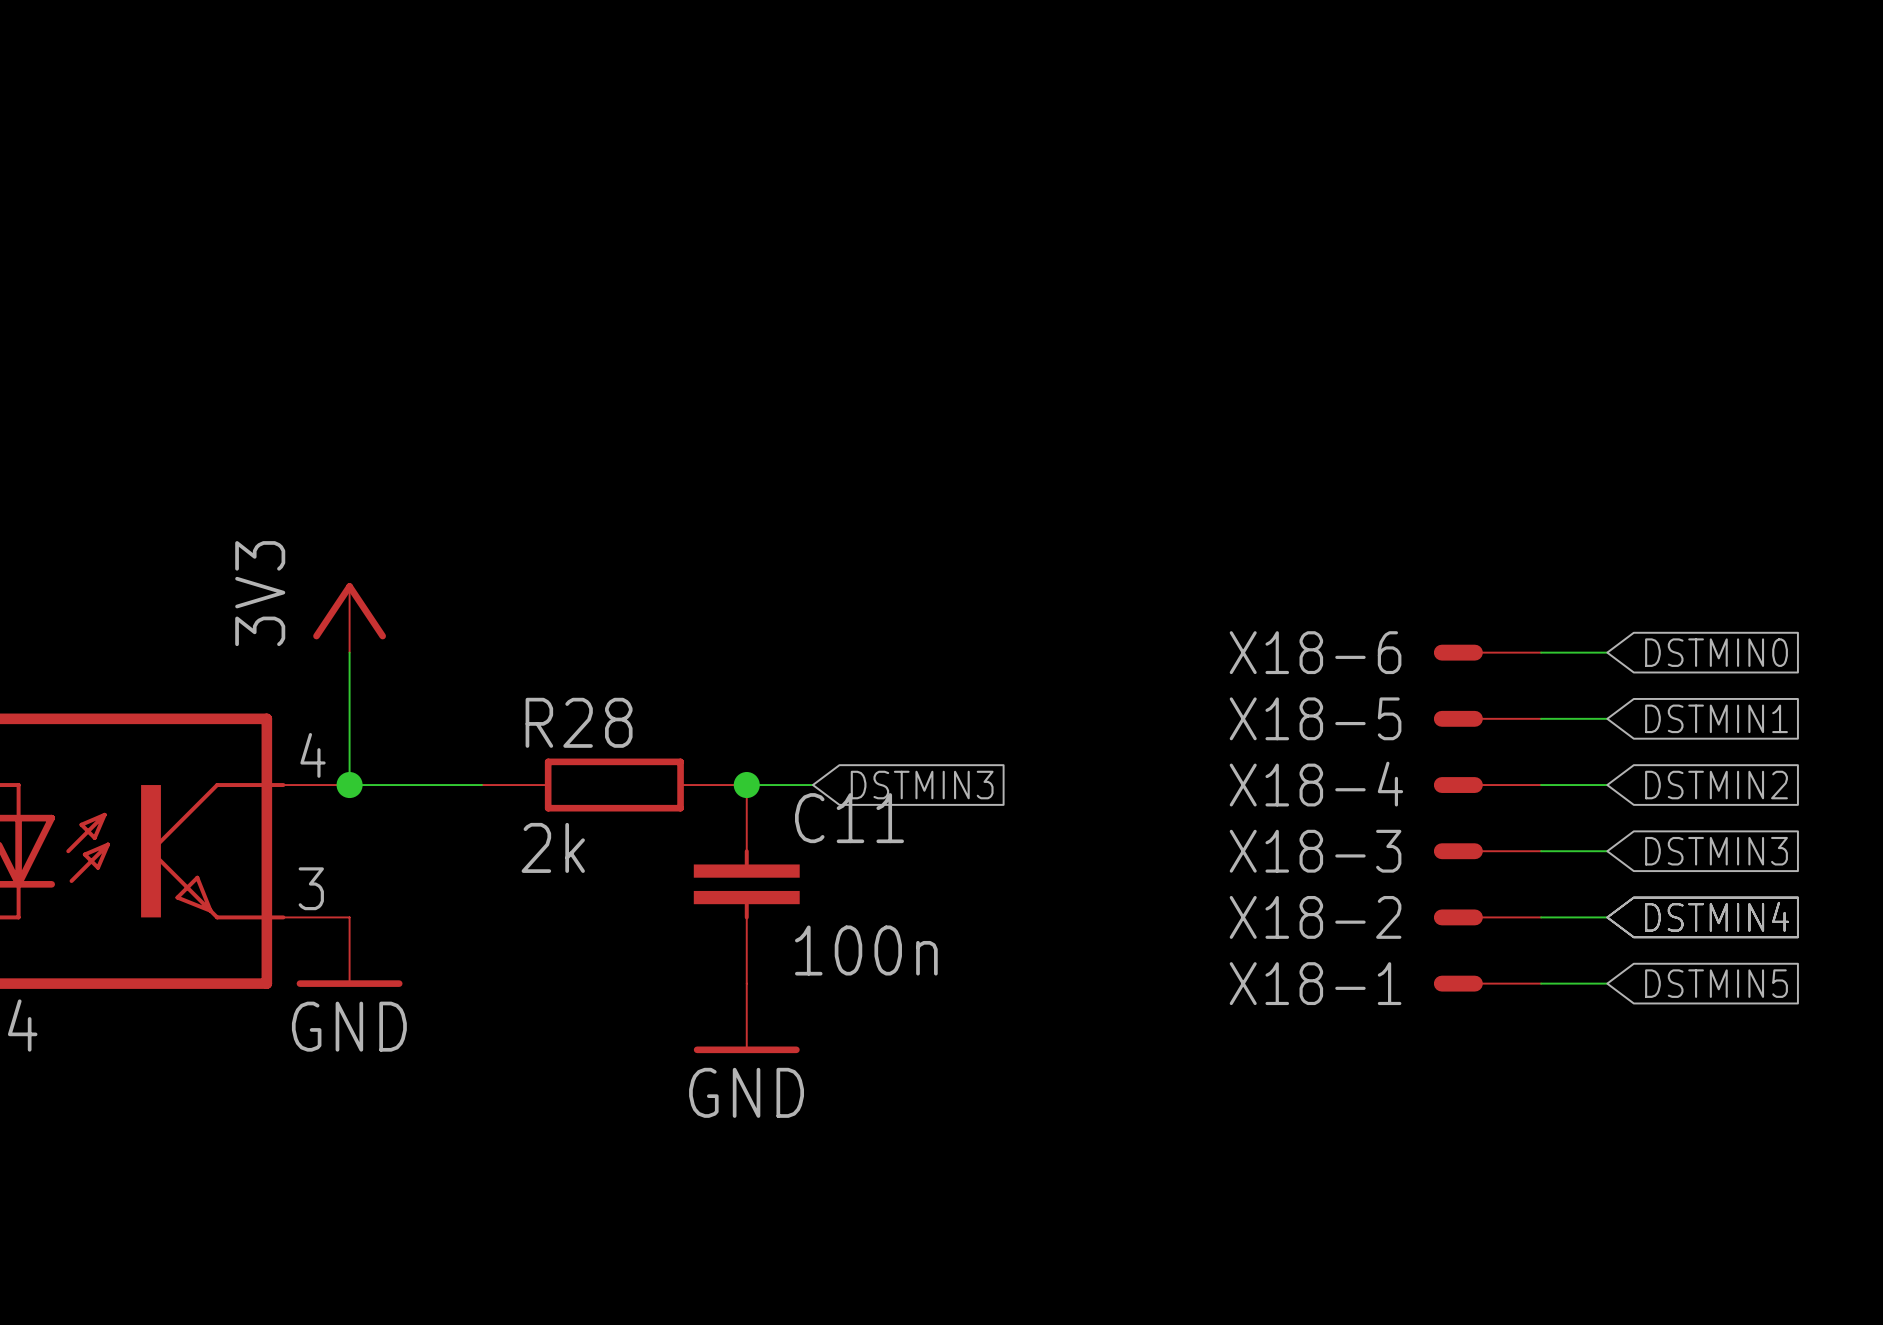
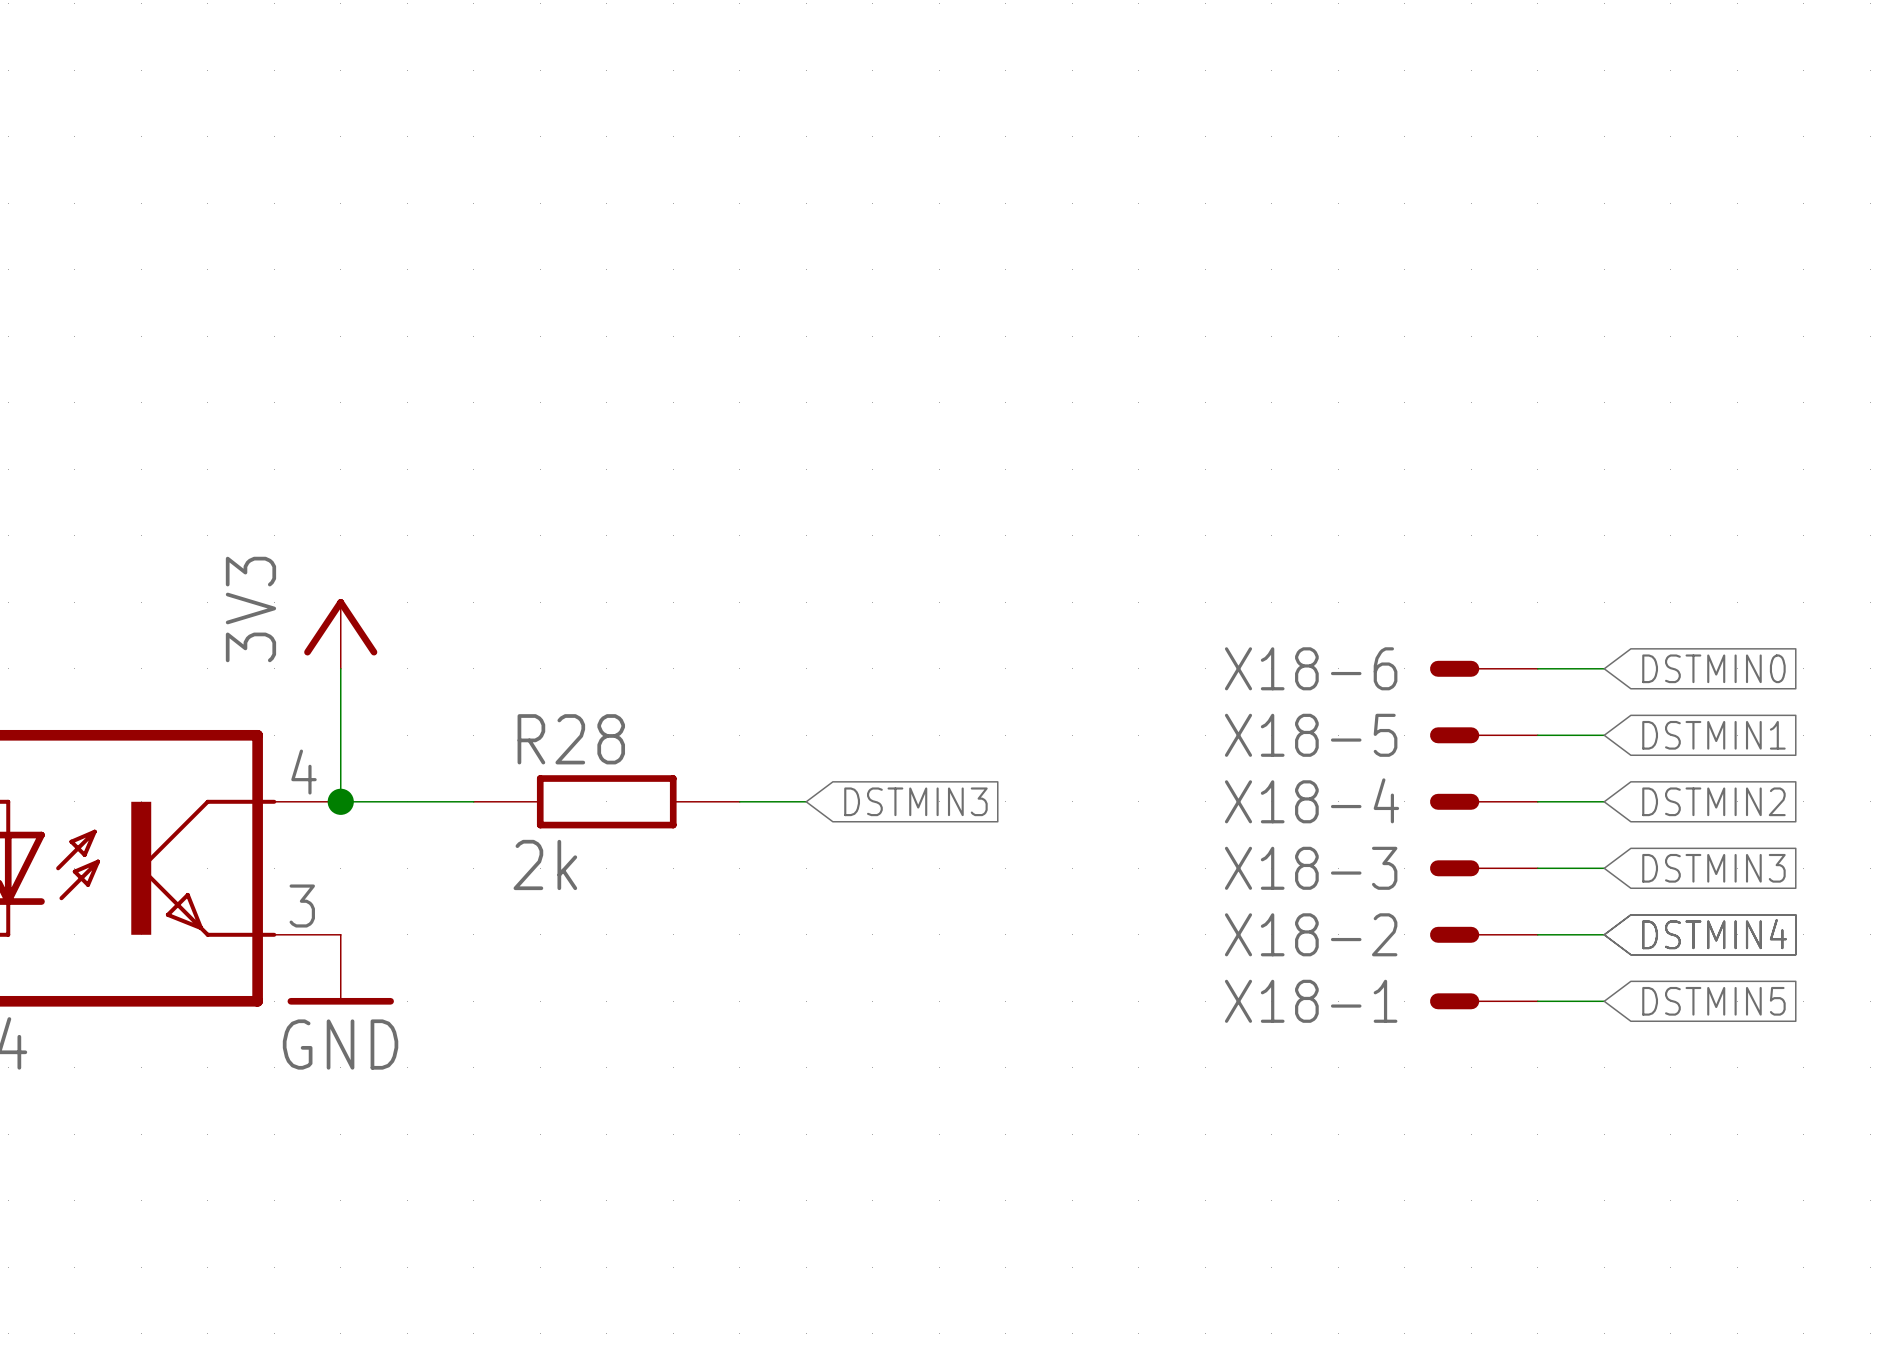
junction: (746, 785) -> none
C11: 100n (746, 884) -> none
power symbol: GND (746, 1018) -> none

